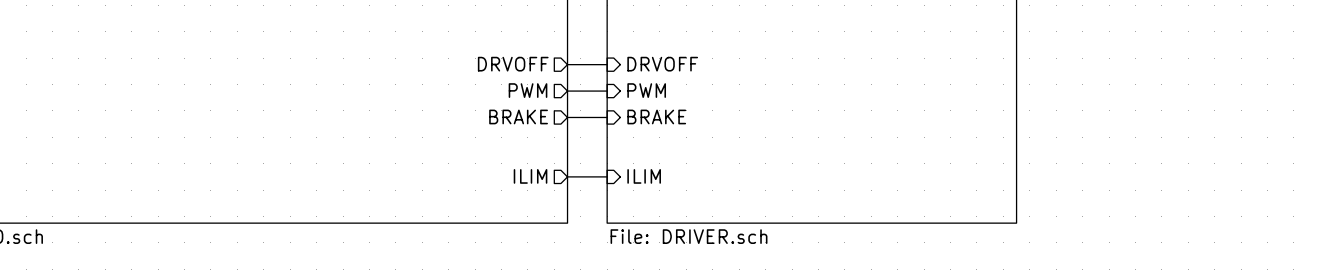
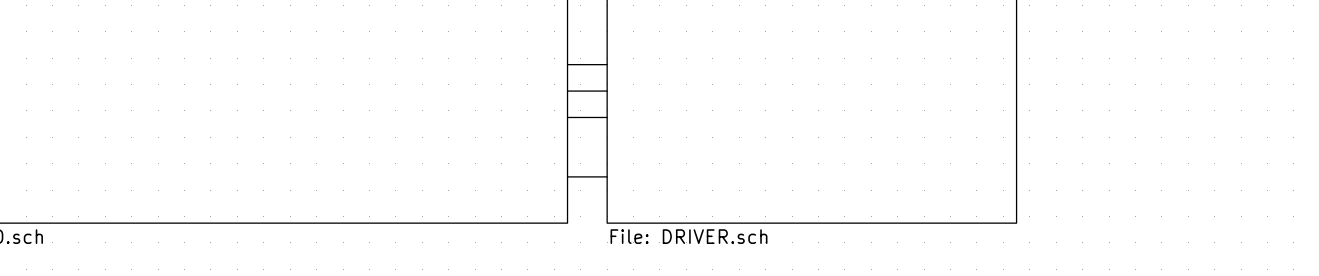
sheet pin: DRVOFF (513, 64) -> none
sheet pin: DRVOFF (662, 64) -> none
sheet pin: PWM (528, 90) -> none
sheet pin: PWM (646, 90) -> none
sheet pin: BRAKE (518, 116) -> none
sheet pin: BRAKE (656, 116) -> none
sheet pin: ILIM (530, 176) -> none
sheet pin: ILIM (644, 176) -> none

